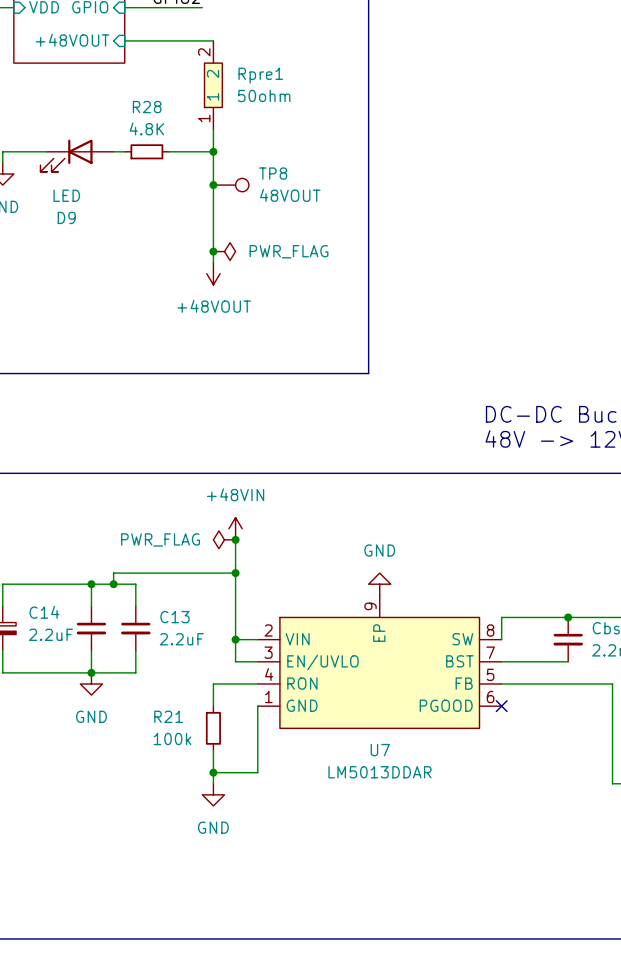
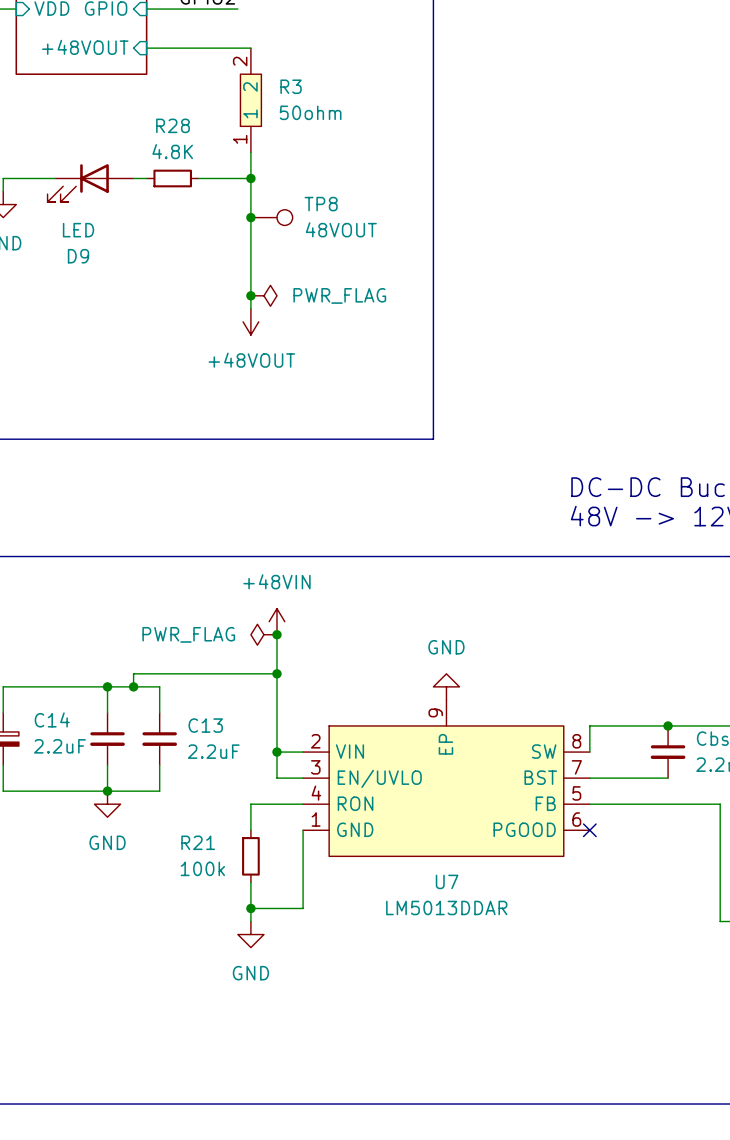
Rpre1 name: Rpre1 (260, 75) -> R3 (291, 86)

